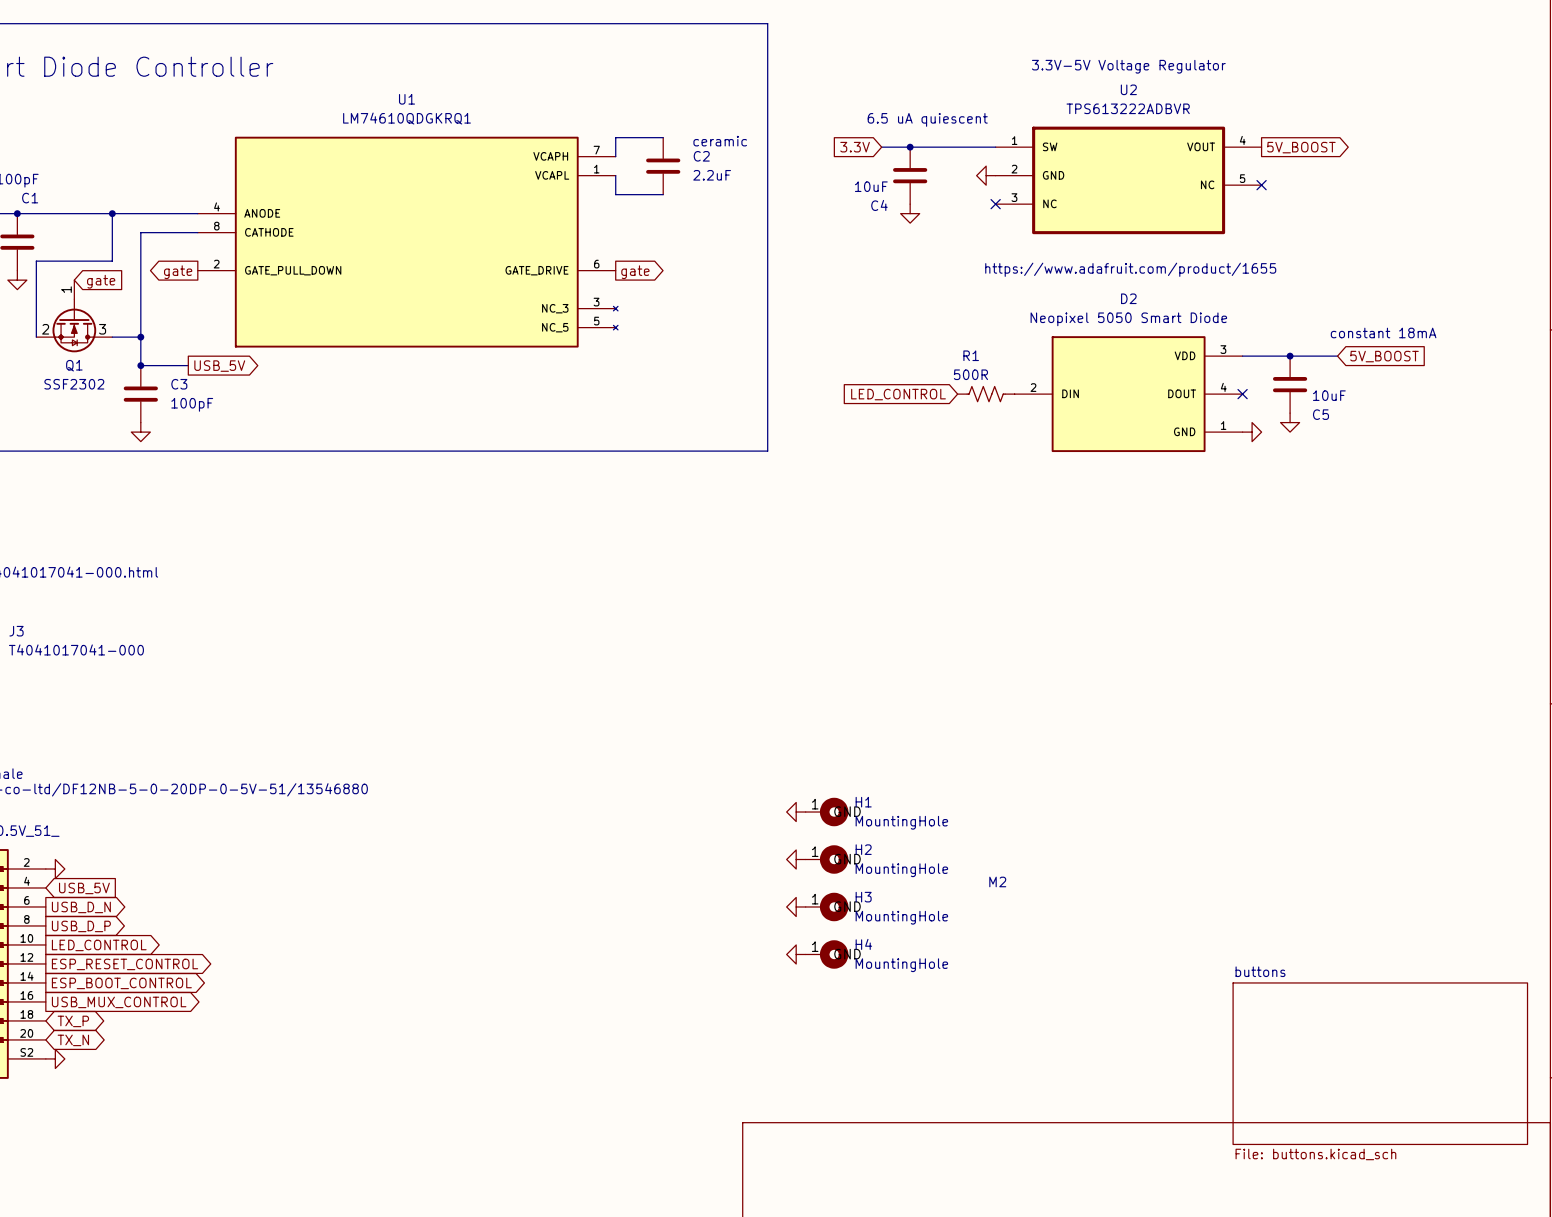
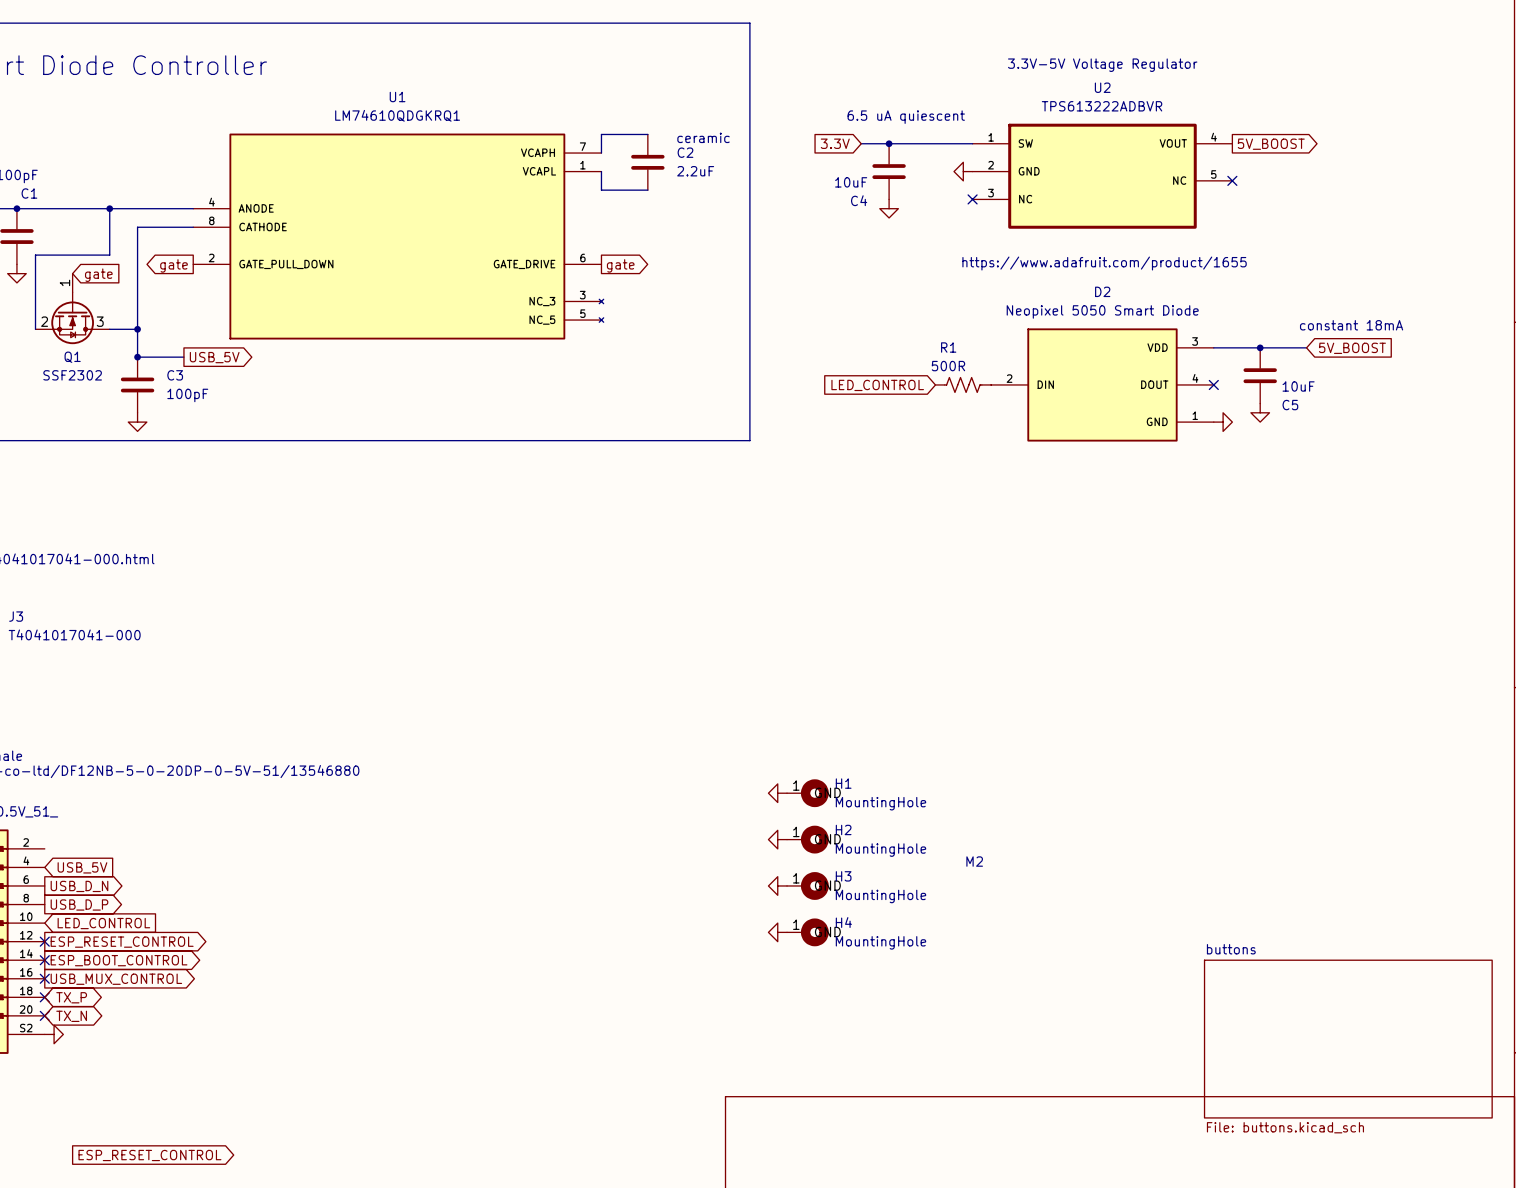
power symbol: (55, 869) -> none
global label shape: output (99, 945) -> input (103, 923)
no-connect mark: none -> (44, 941)
no-connect mark: none -> (44, 960)
no-connect mark: none -> (44, 978)
no-connect mark: none -> (44, 997)
no-connect mark: none -> (44, 1015)
global label: none -> ESP_RESET_CONTROL (149, 1155)

